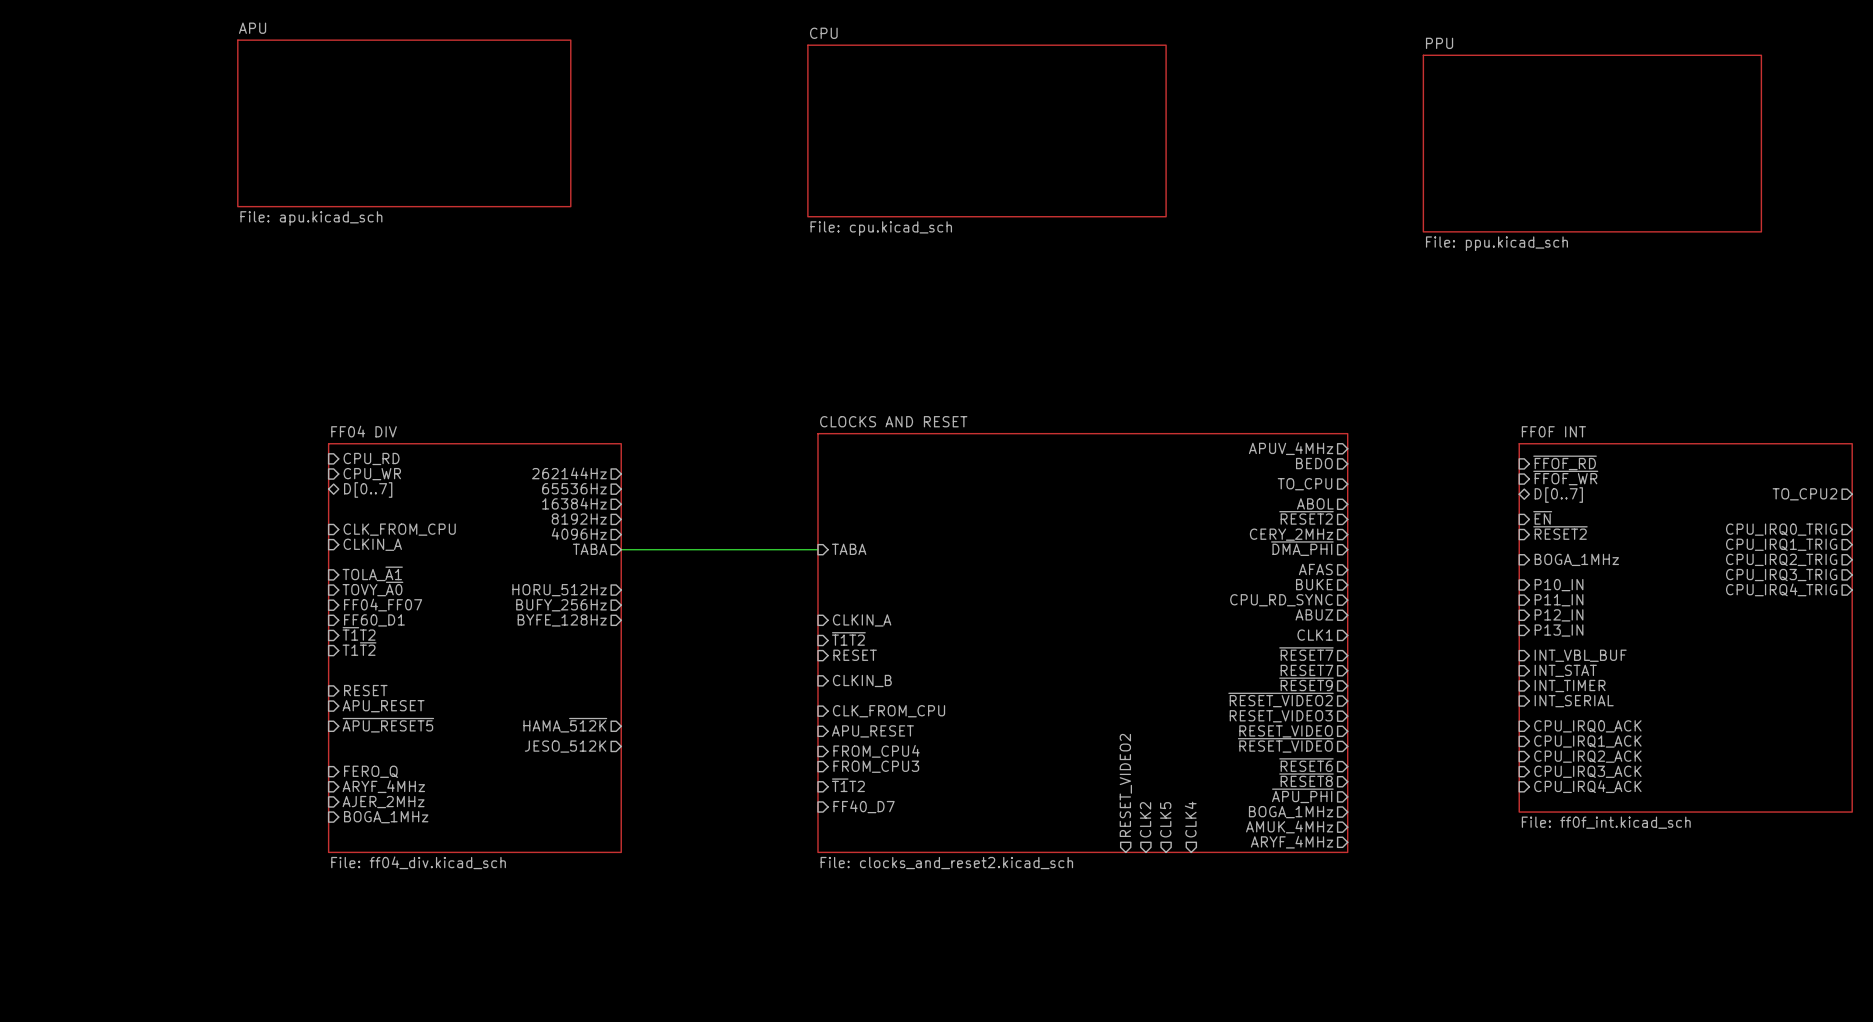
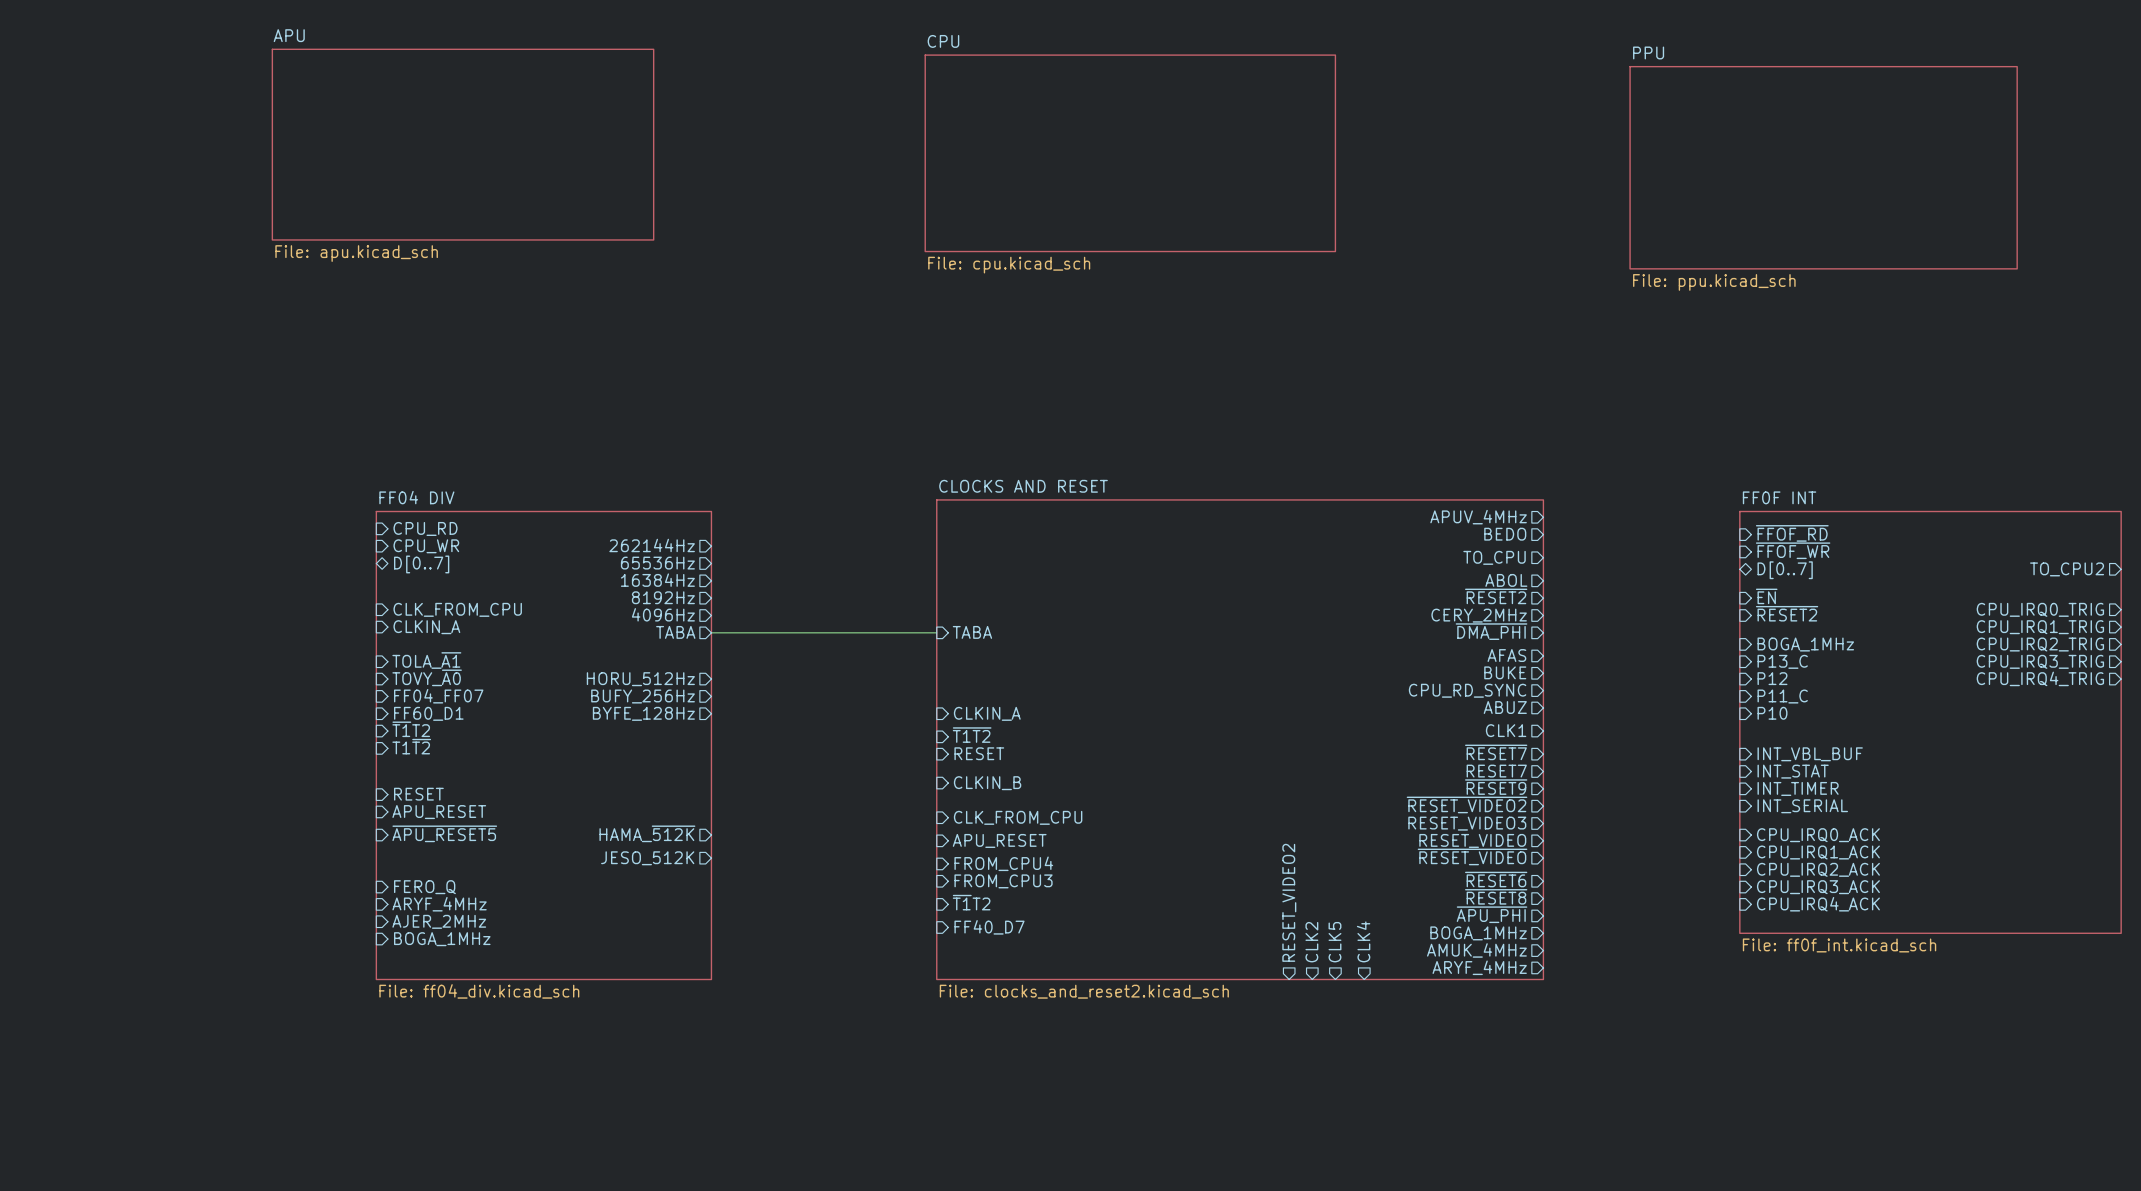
sheet pin: none -> P13_C (1782, 661)
sheet pin: P10_IN (1559, 585) -> none
sheet pin: none -> P12 (1772, 678)
sheet pin: P11_IN (1559, 600) -> P11_C (1782, 696)
sheet pin: P12_IN (1559, 615) -> none
sheet pin: none -> P10 (1772, 713)
sheet pin: P13_IN (1559, 630) -> none

